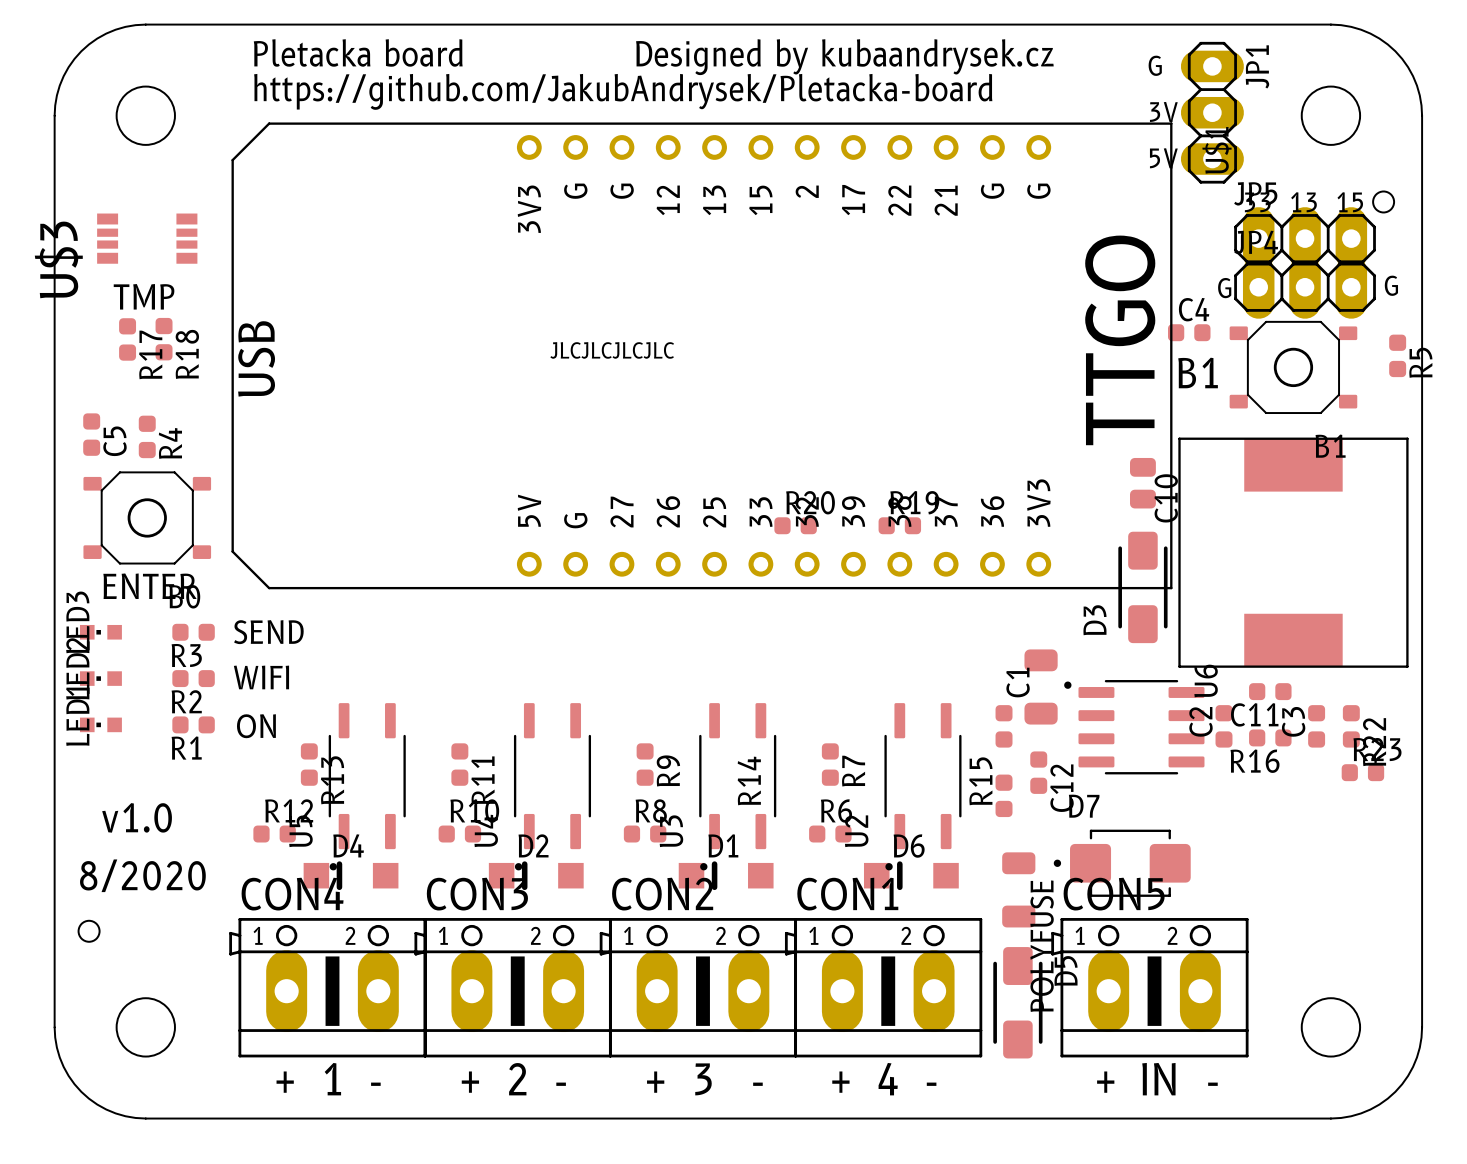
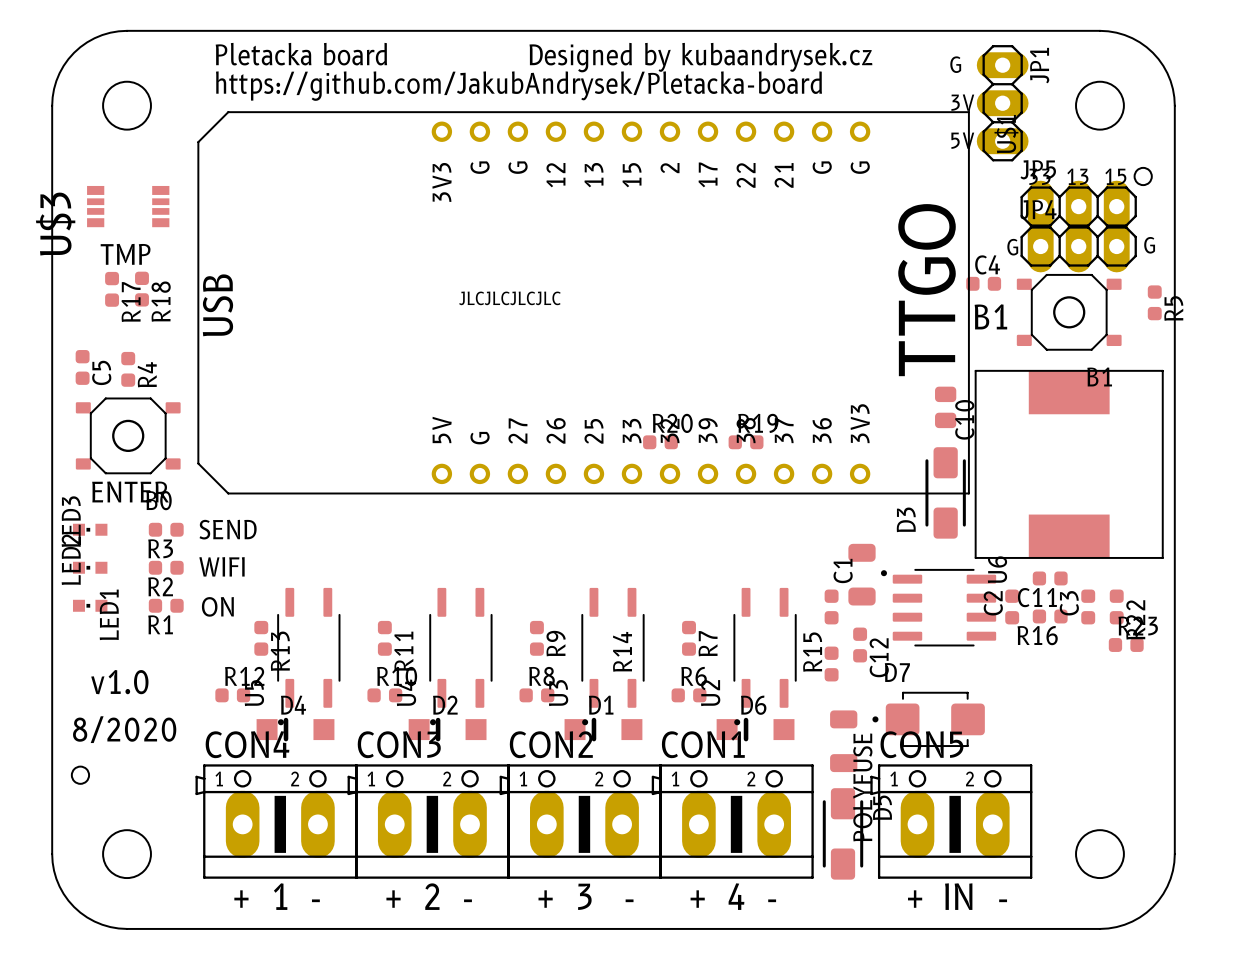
LED1 name position: LED1 (77, 715) -> LED1 (109, 614)

